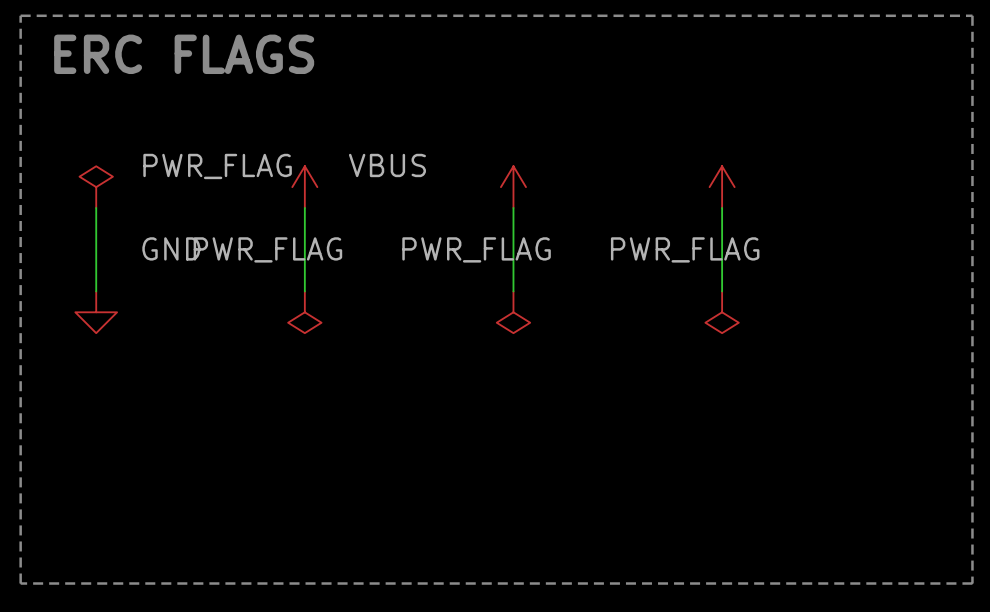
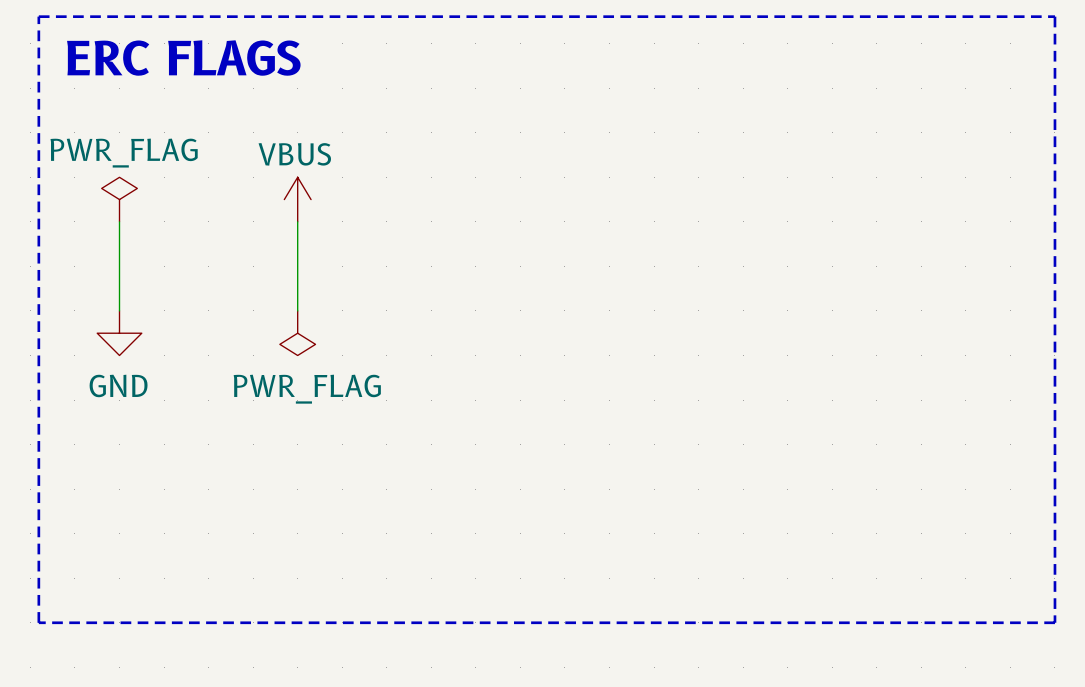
power symbol text position: VBUS (387, 165) -> VBUS (294, 154)
power symbol text position: PWR_FLAG (217, 166) -> PWR_FLAG (124, 153)
power symbol position: VBUS (304, 187) -> VBUS (297, 199)
power symbol: (513, 187) -> none
power symbol: (722, 187) -> none
wire: (304, 207) (304, 291) -> (297, 221) (297, 310)
wire: (513, 207) (513, 291) -> none
wire: (722, 207) (722, 291) -> none
power symbol text position: GND (171, 248) -> GND (118, 385)
power symbol text position: PWR_FLAG (267, 249) -> PWR_FLAG (307, 389)
power symbol position: PWR_FLAG (304, 312) -> PWR_FLAG (297, 333)
power symbol: PWR_FLAG (513, 312) -> none
power symbol: PWR_FLAG (722, 312) -> none

